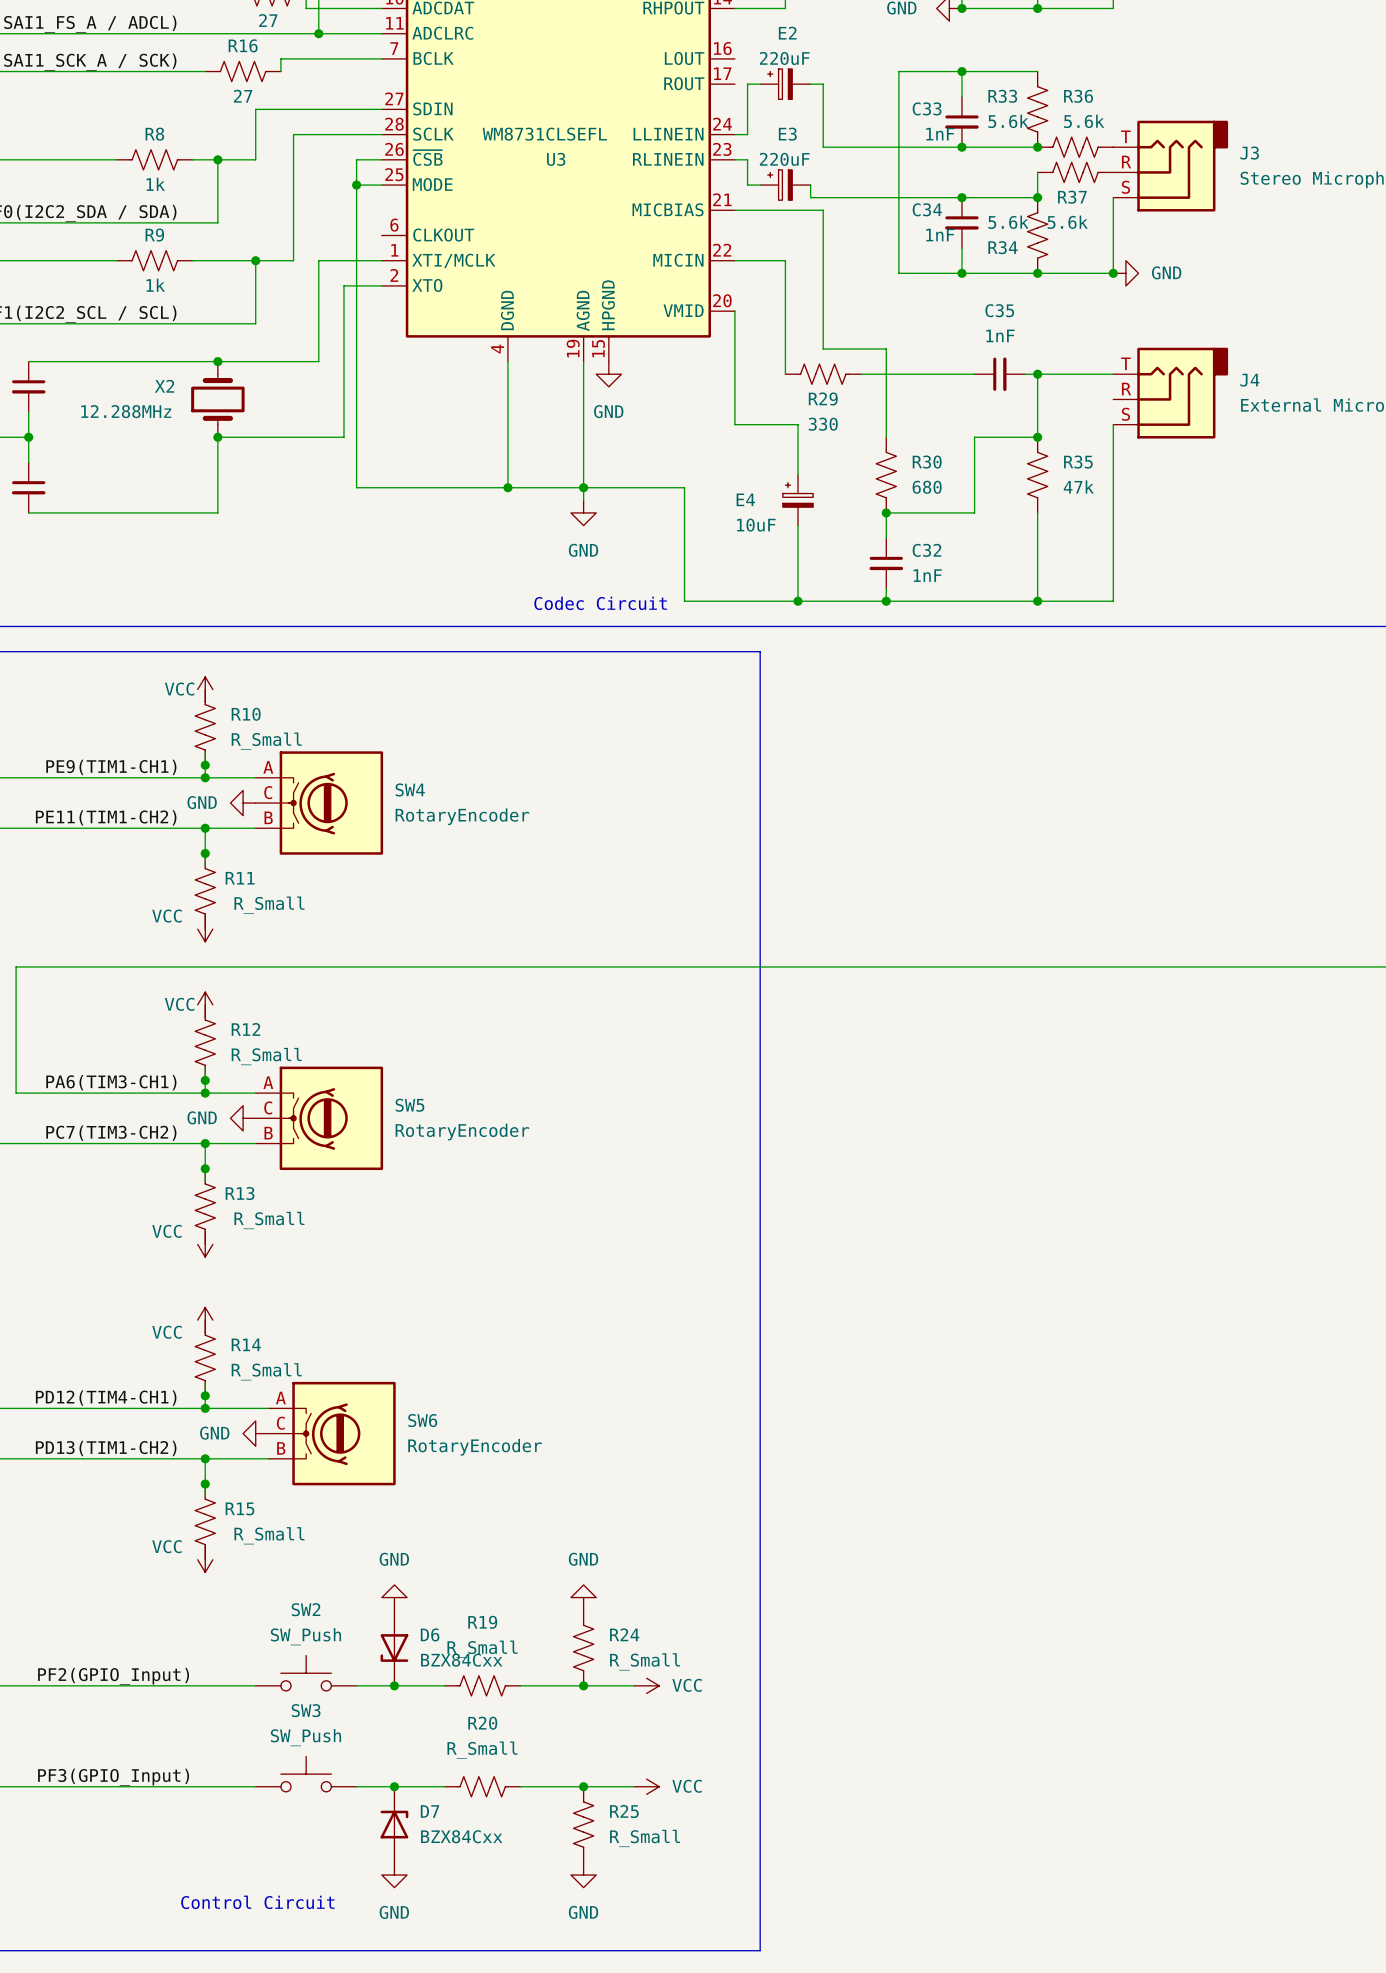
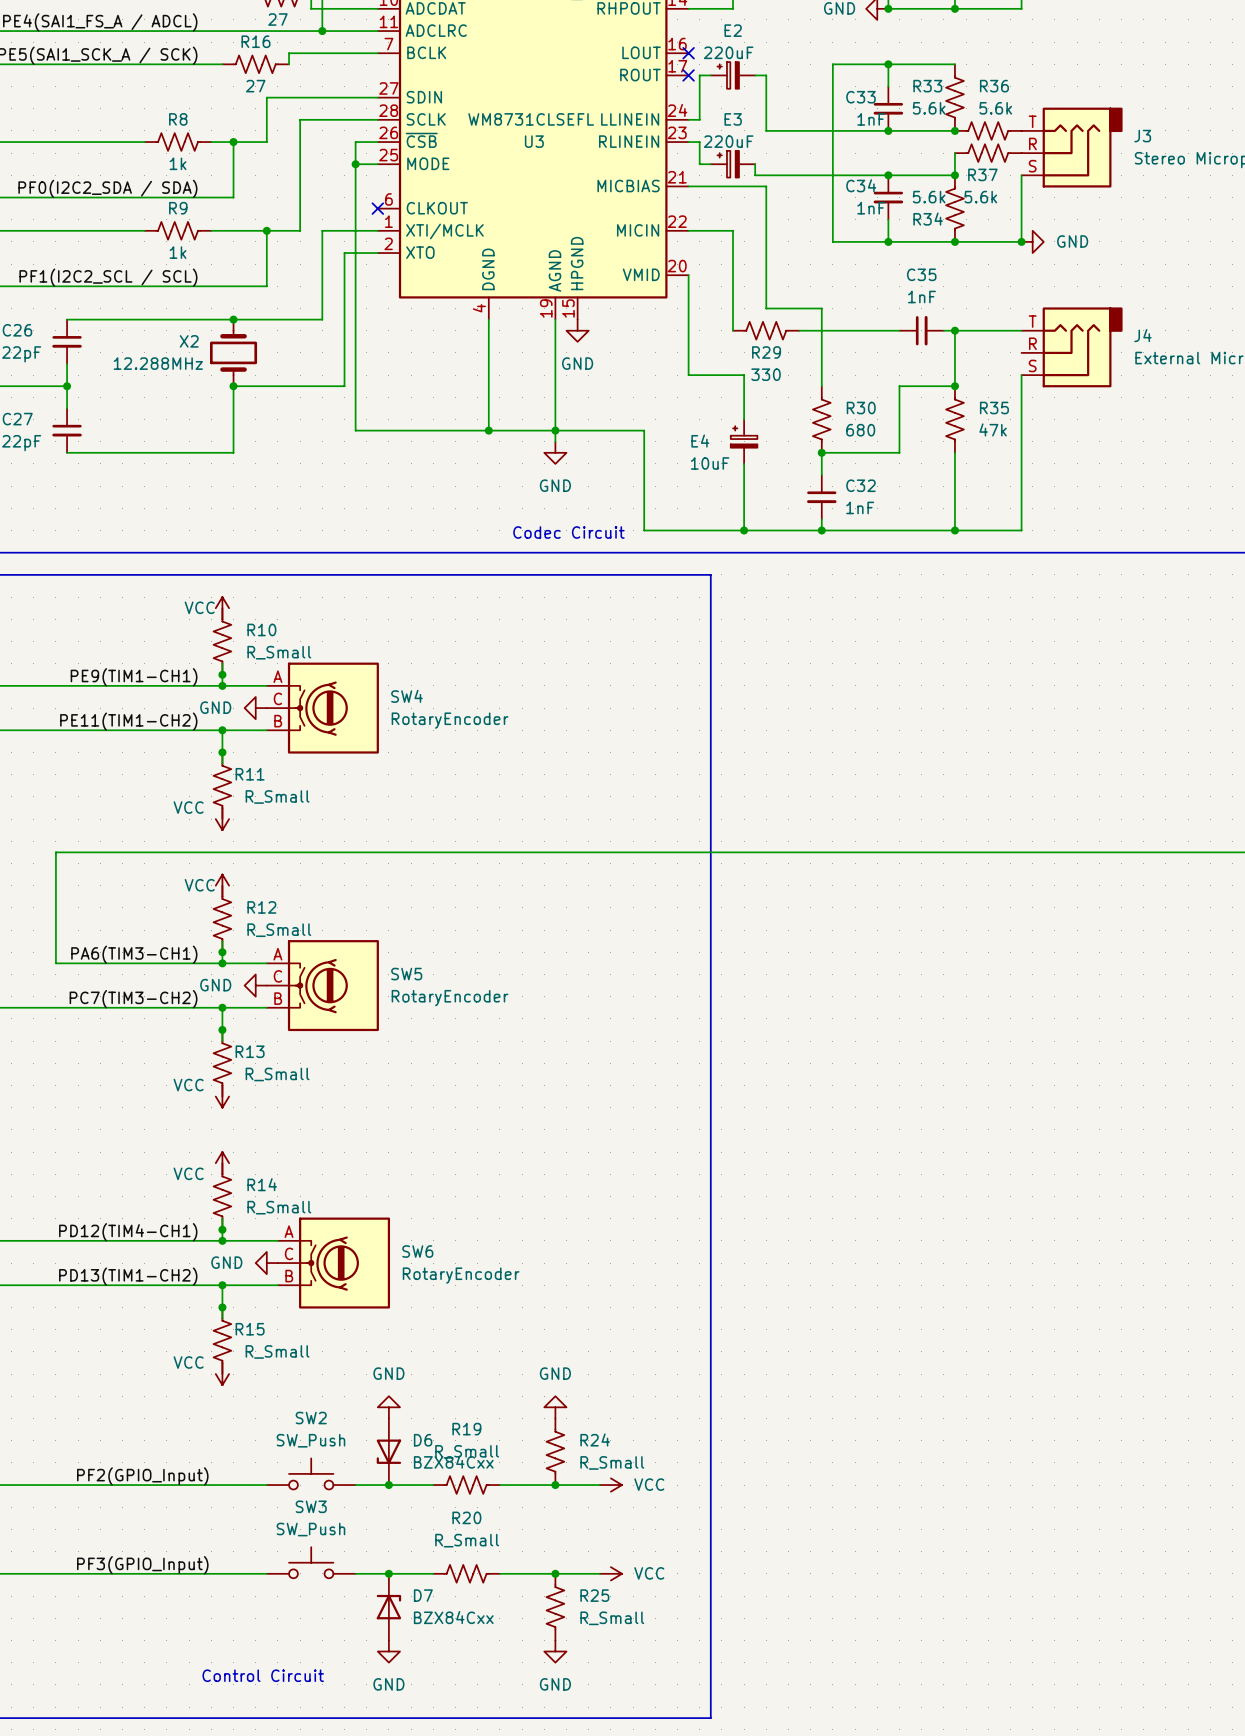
no-connect mark: none -> (688, 53)
no-connect mark: none -> (688, 75)
no-connect mark: none -> (377, 208)

